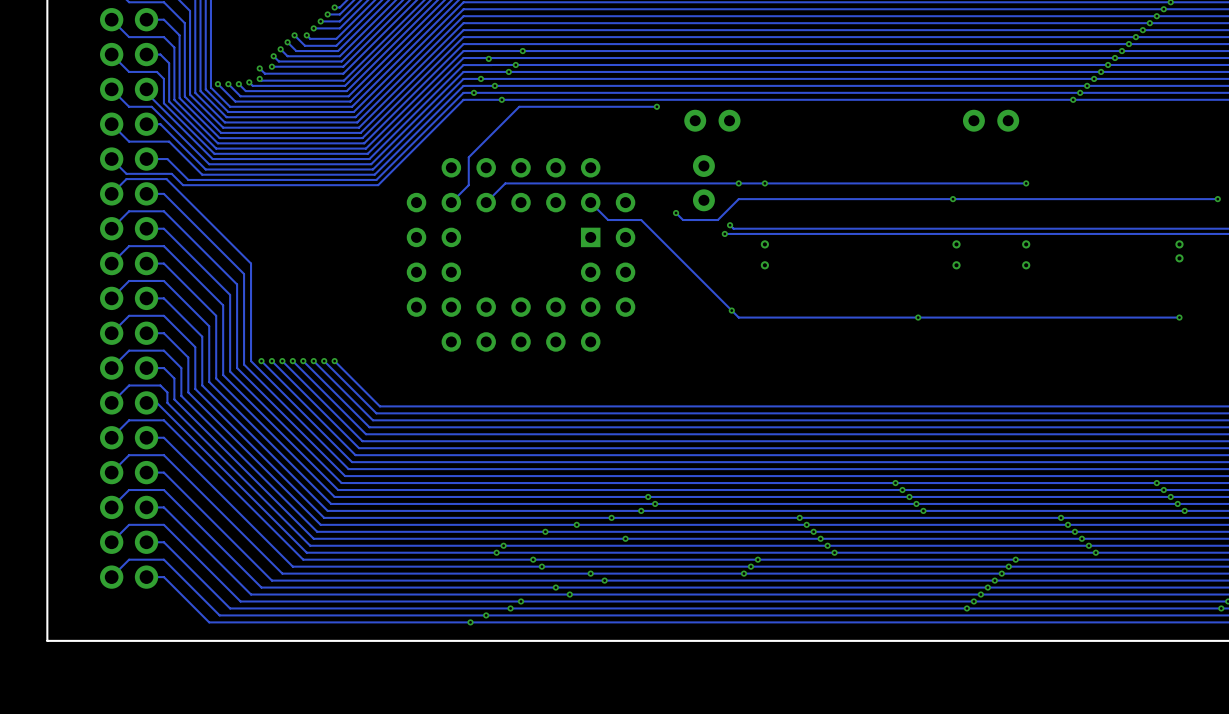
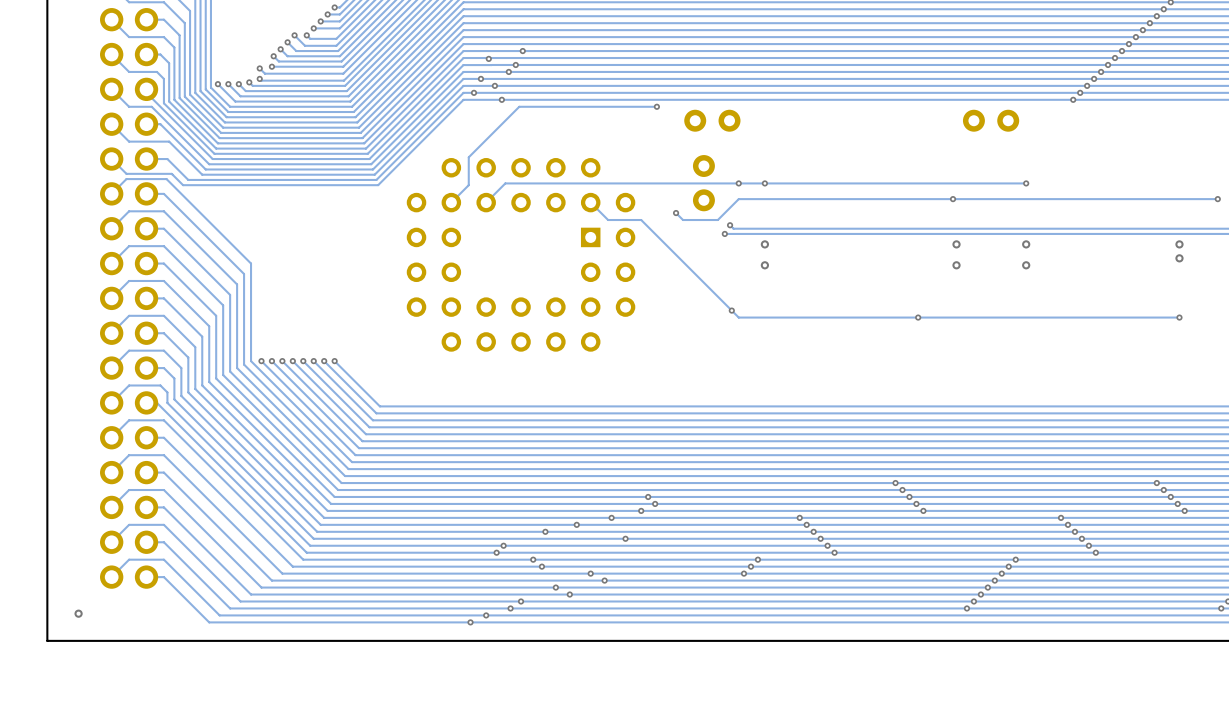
via: none -> (78, 613)

